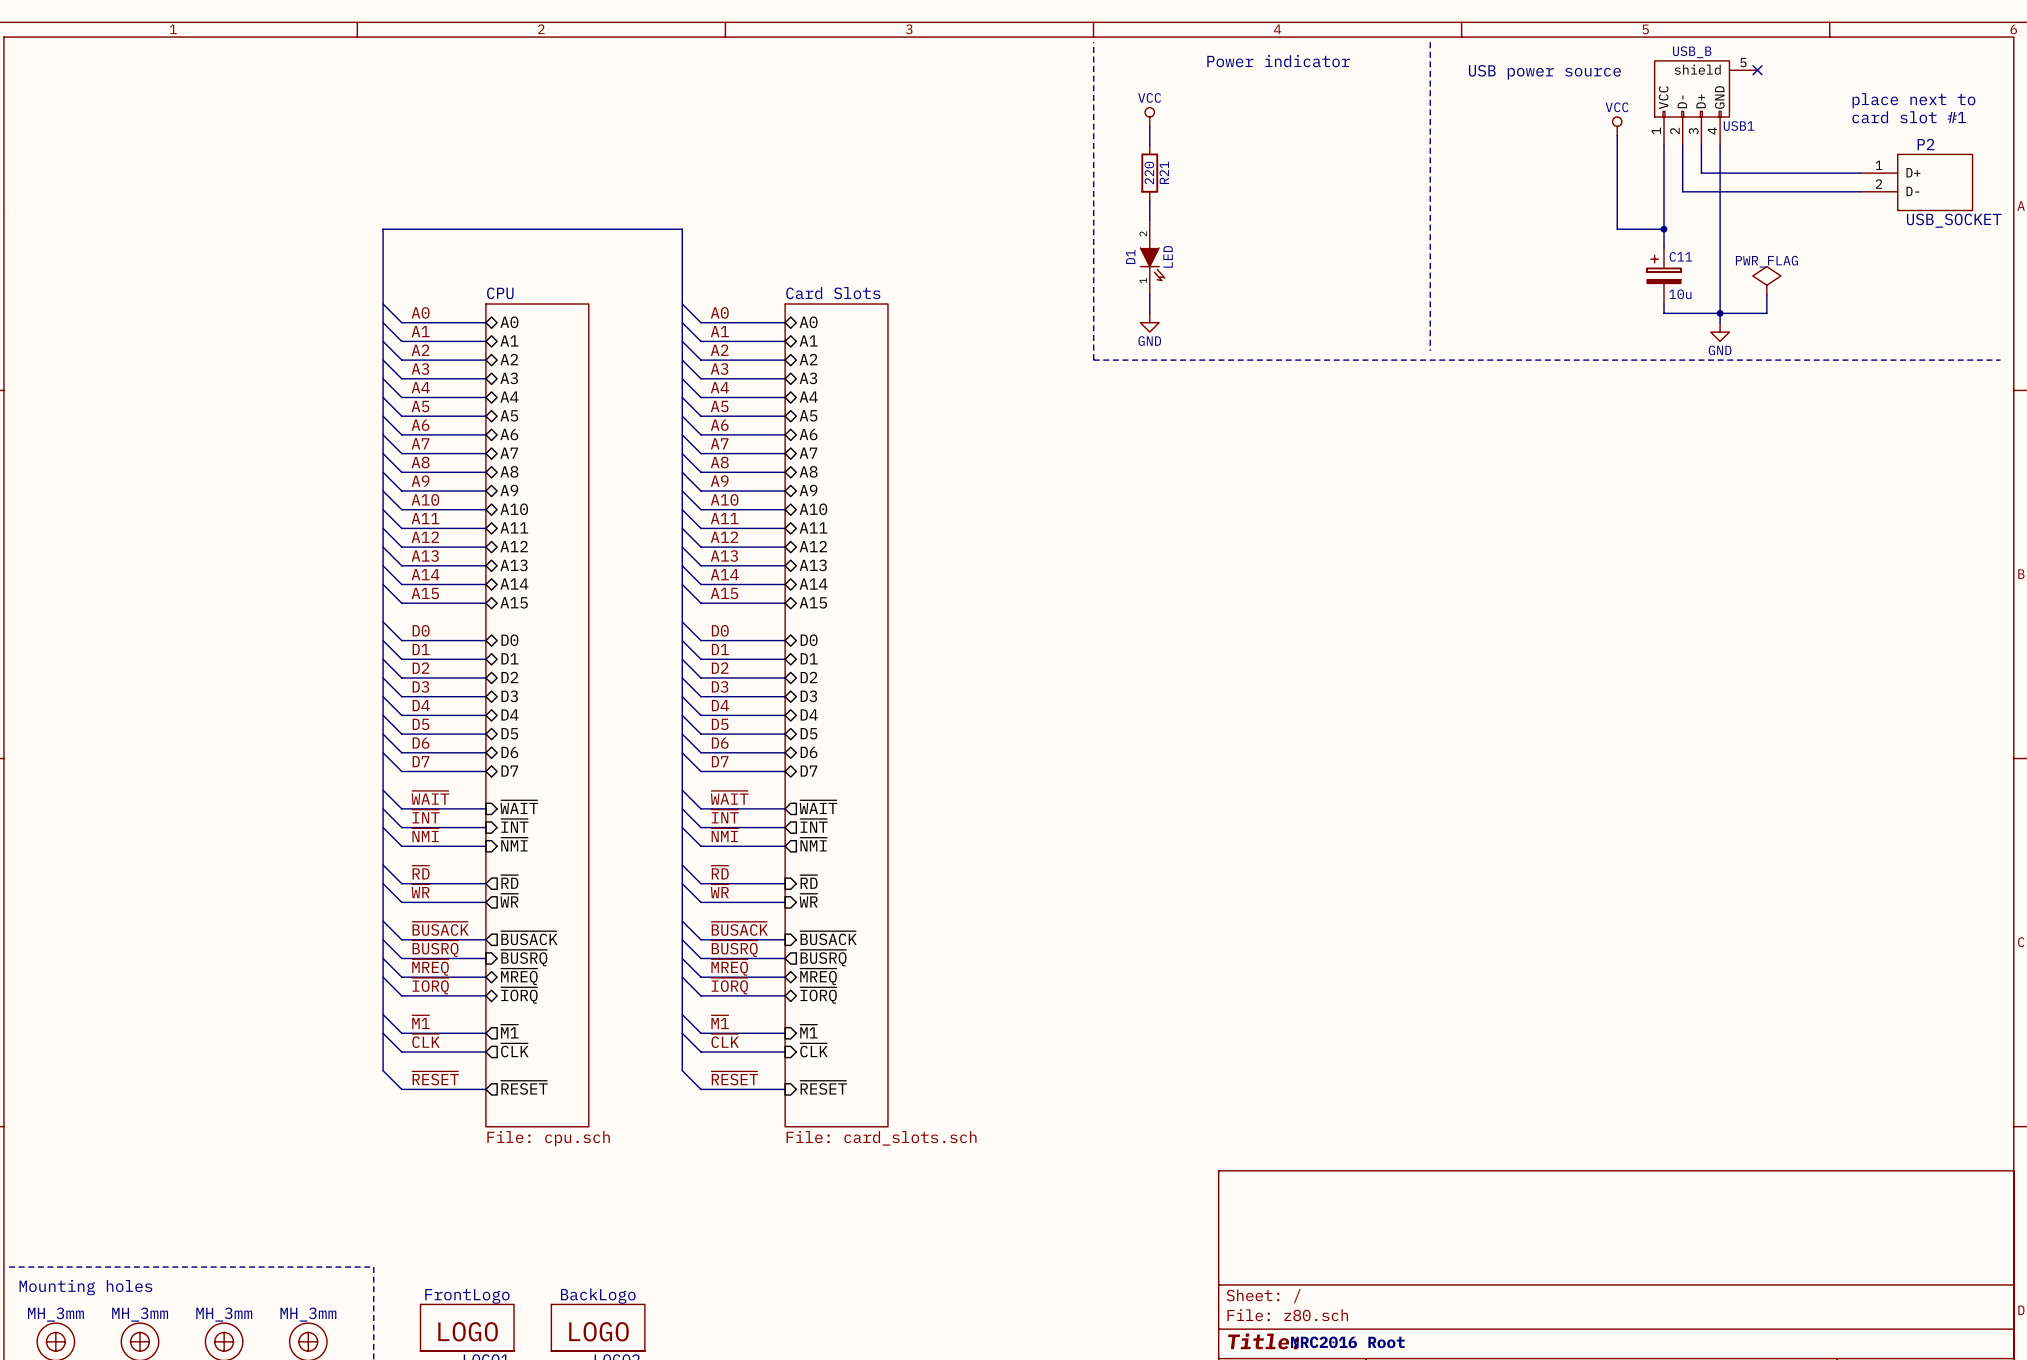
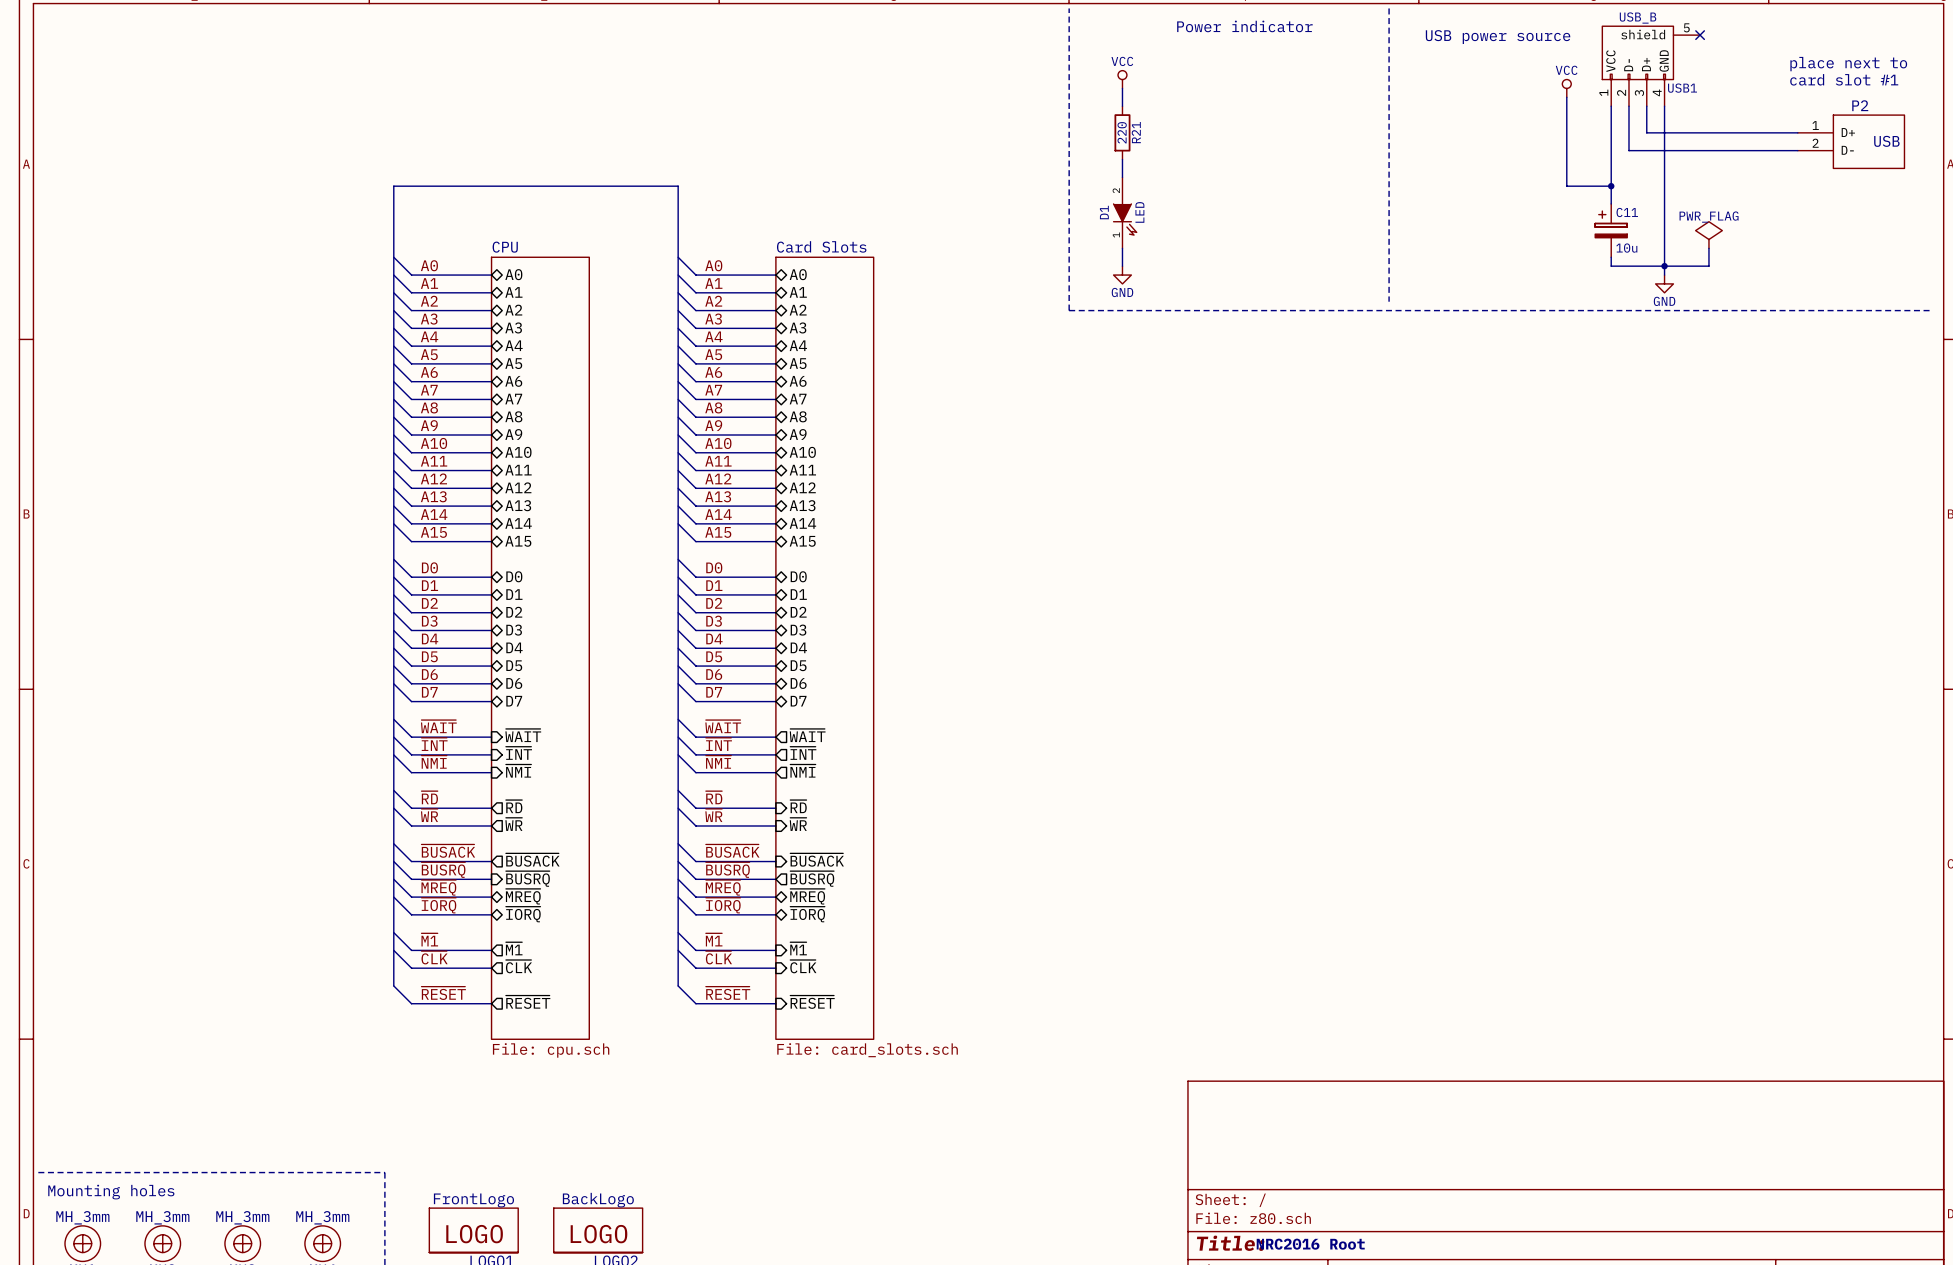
P2 value: USB_SOCKET (1954, 220) -> USB (1886, 141)

